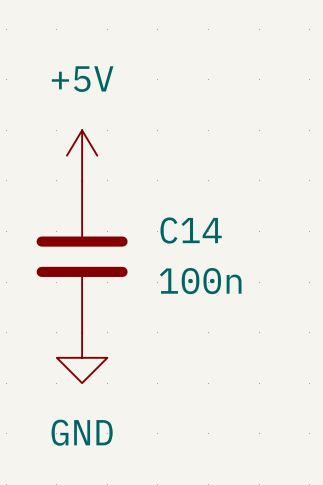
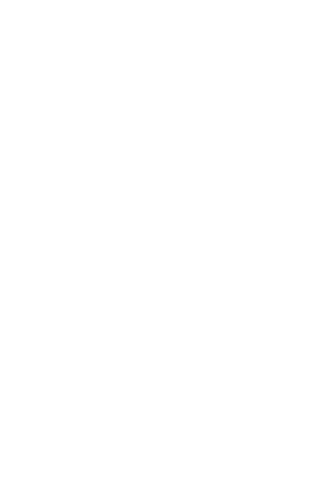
power symbol: +5V (82, 155) -> none
C14: 100n (82, 256) -> none
power symbol: GND (82, 357) -> none

